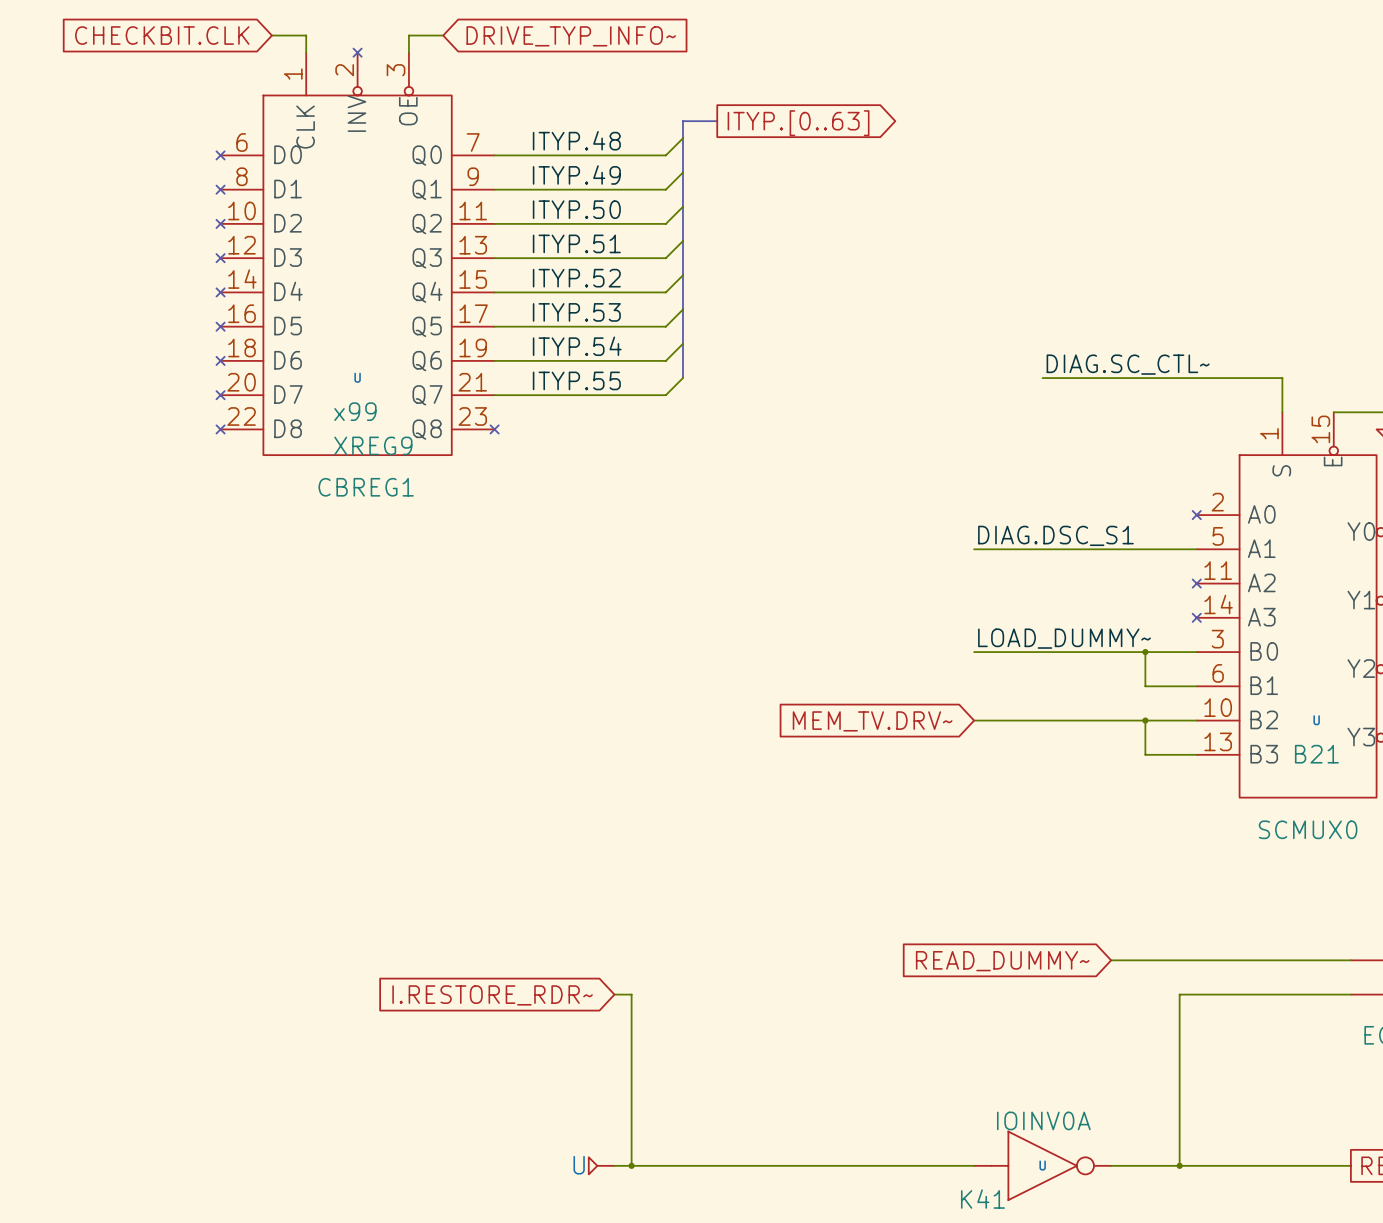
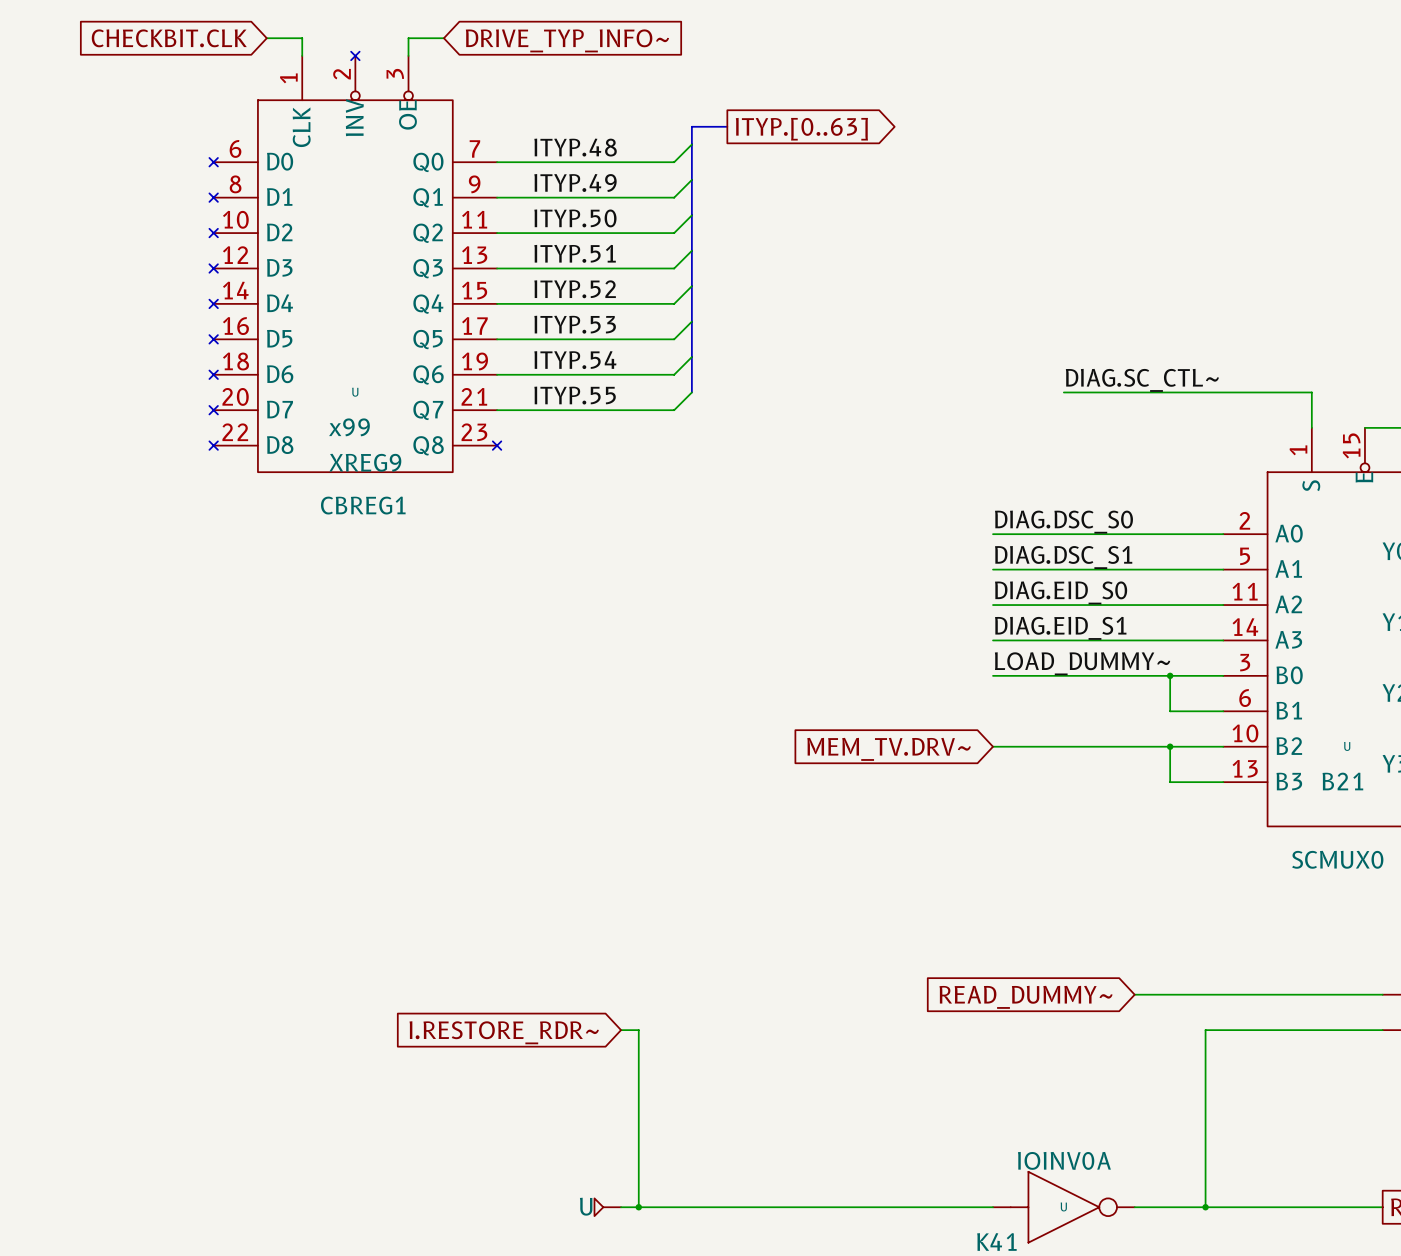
label: none -> DIAG.DSC_S0 (1063, 522)
wire: none -> (993, 534) (1223, 534)
no-connect mark: (1196, 515) -> none
label: none -> DIAG.EID_S0 (1061, 592)
wire: none -> (993, 605) (1223, 605)
no-connect mark: (1196, 583) -> none
label: none -> DIAG.EID_S1 (1060, 628)
wire: none -> (993, 640) (1223, 640)
no-connect mark: (1196, 617) -> none

